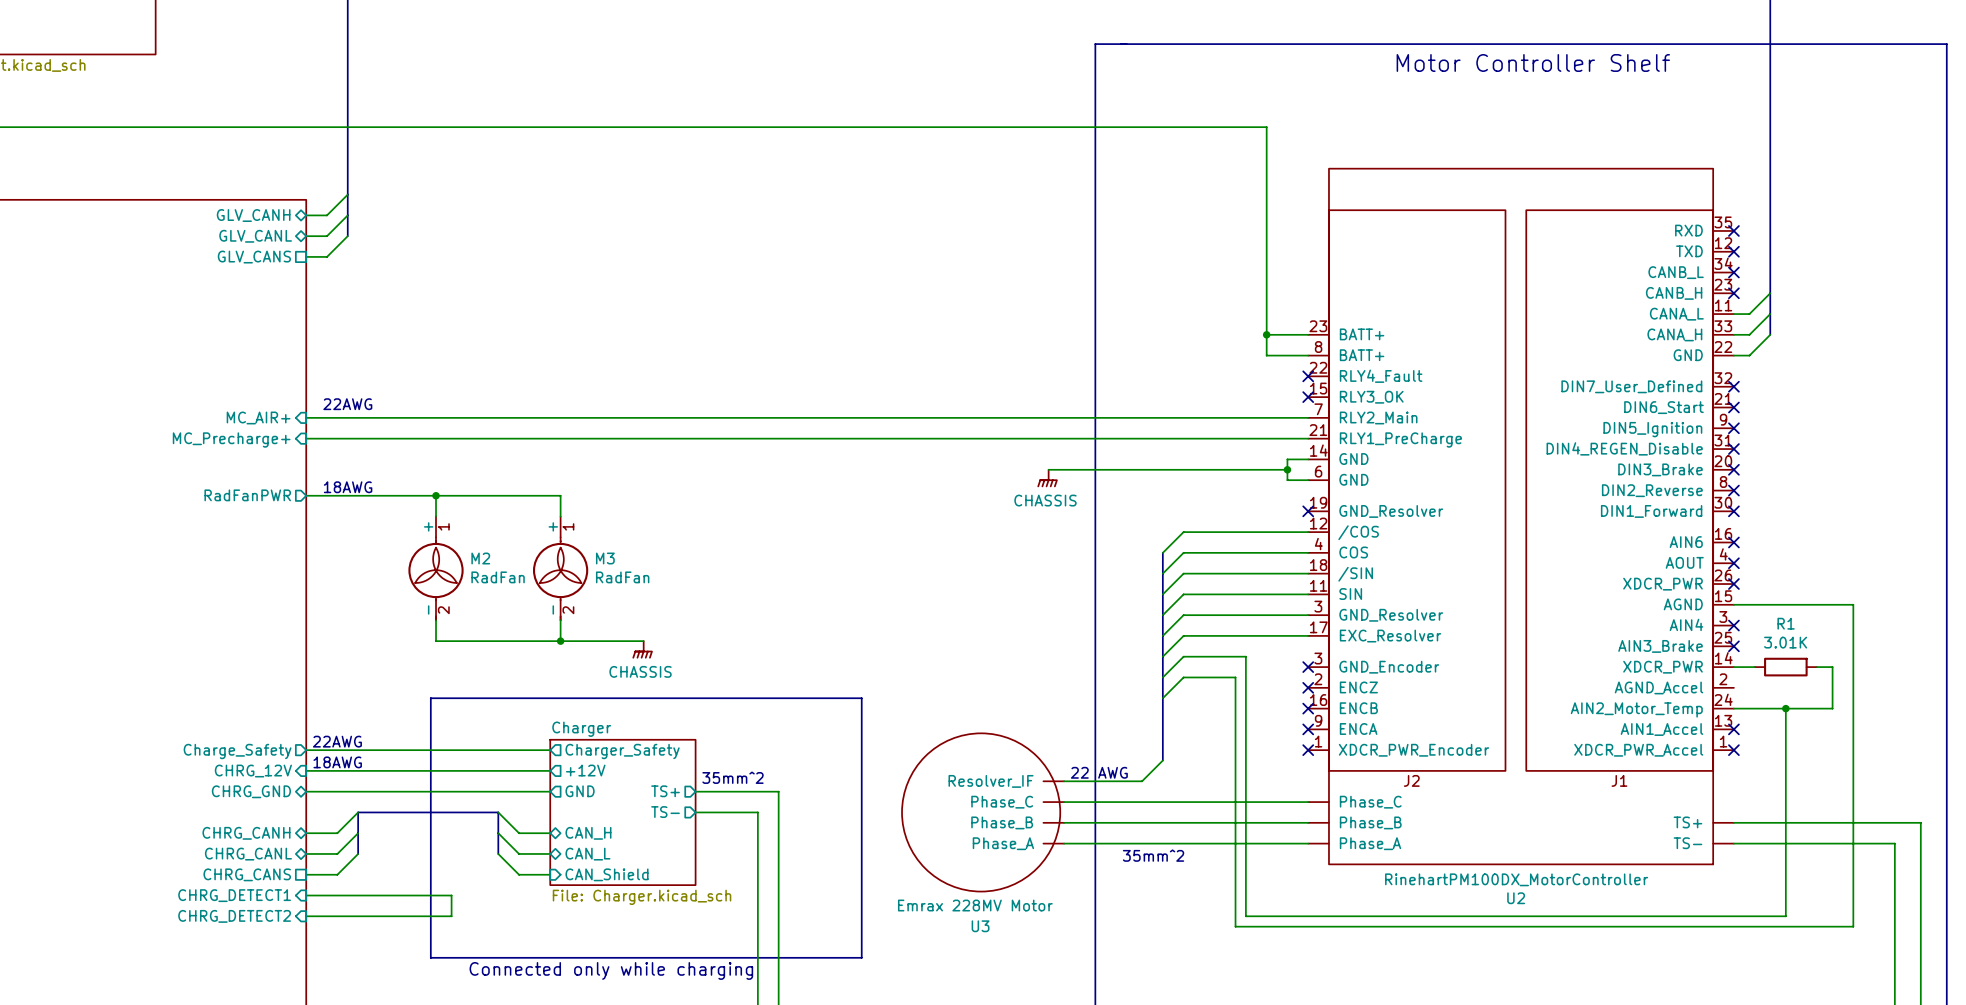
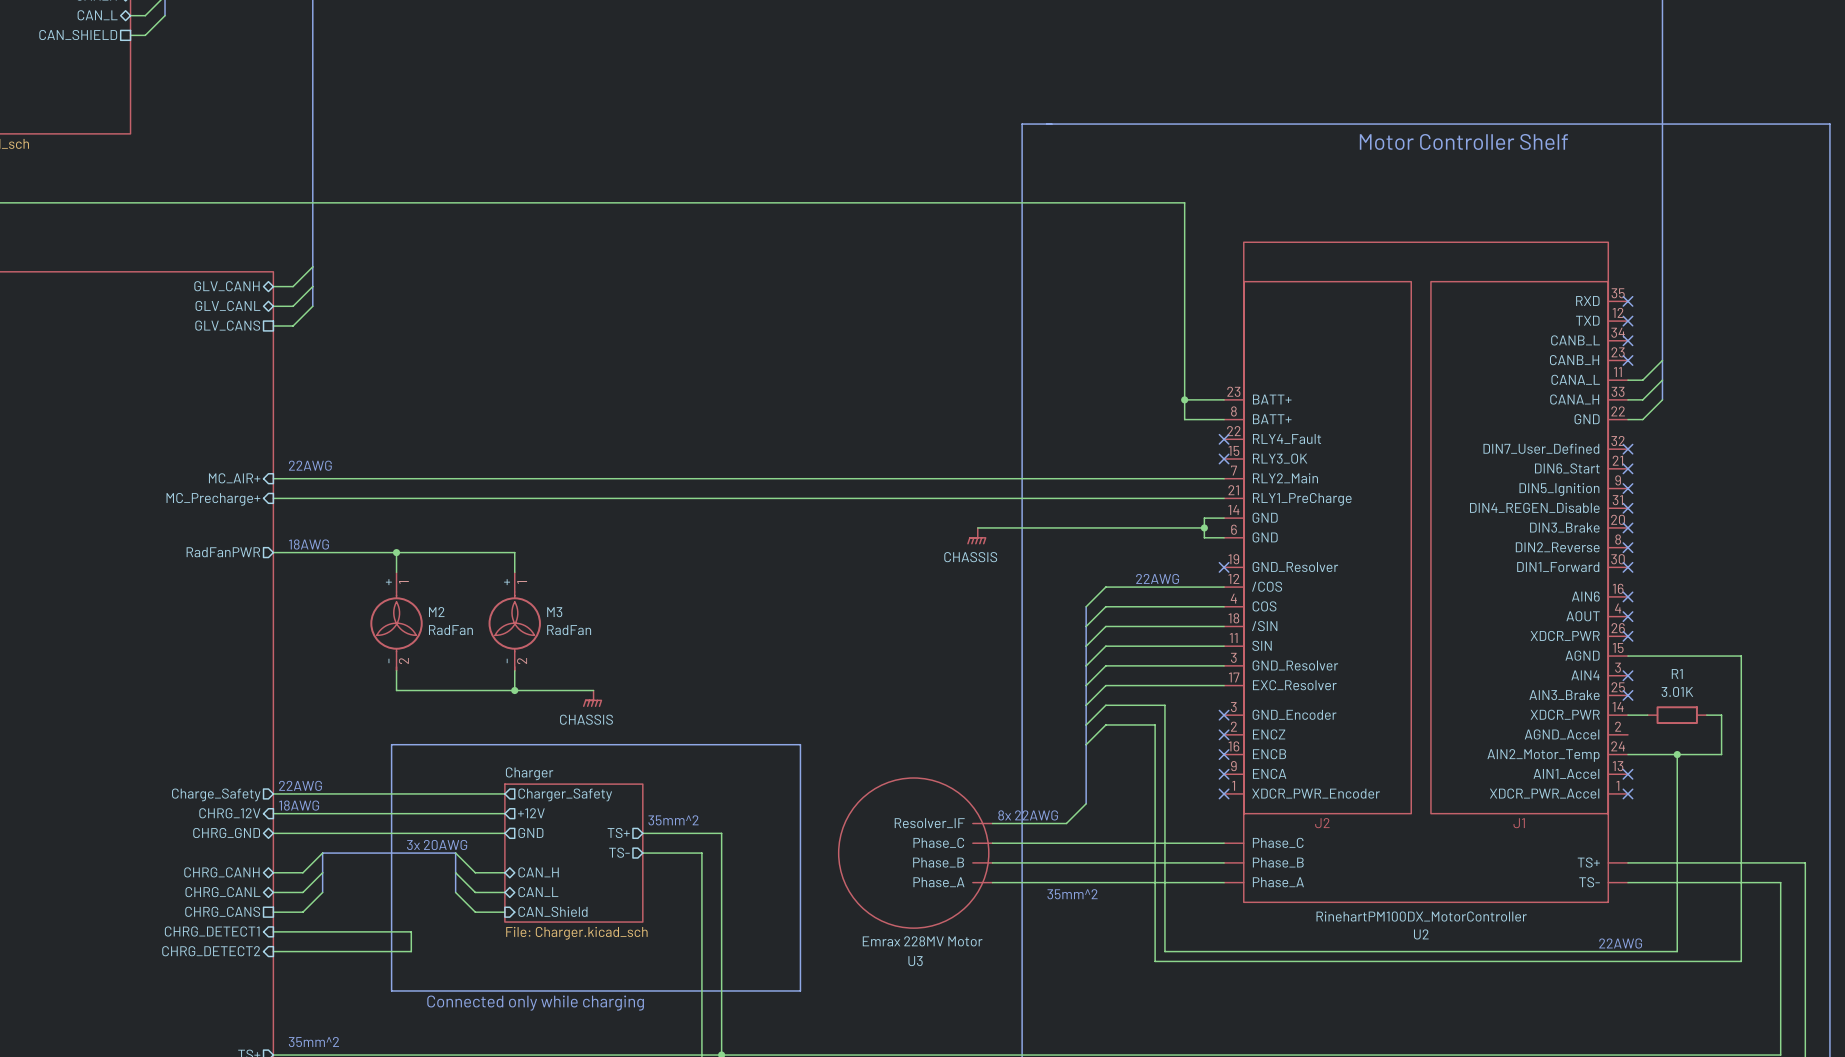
text: none -> 22AWG (1157, 579)
text: 22 AWG (1099, 772) -> 8x 22AWG (1028, 815)
text: none -> 3x 20AWG (437, 845)
text: none -> 22AWG (1620, 943)

